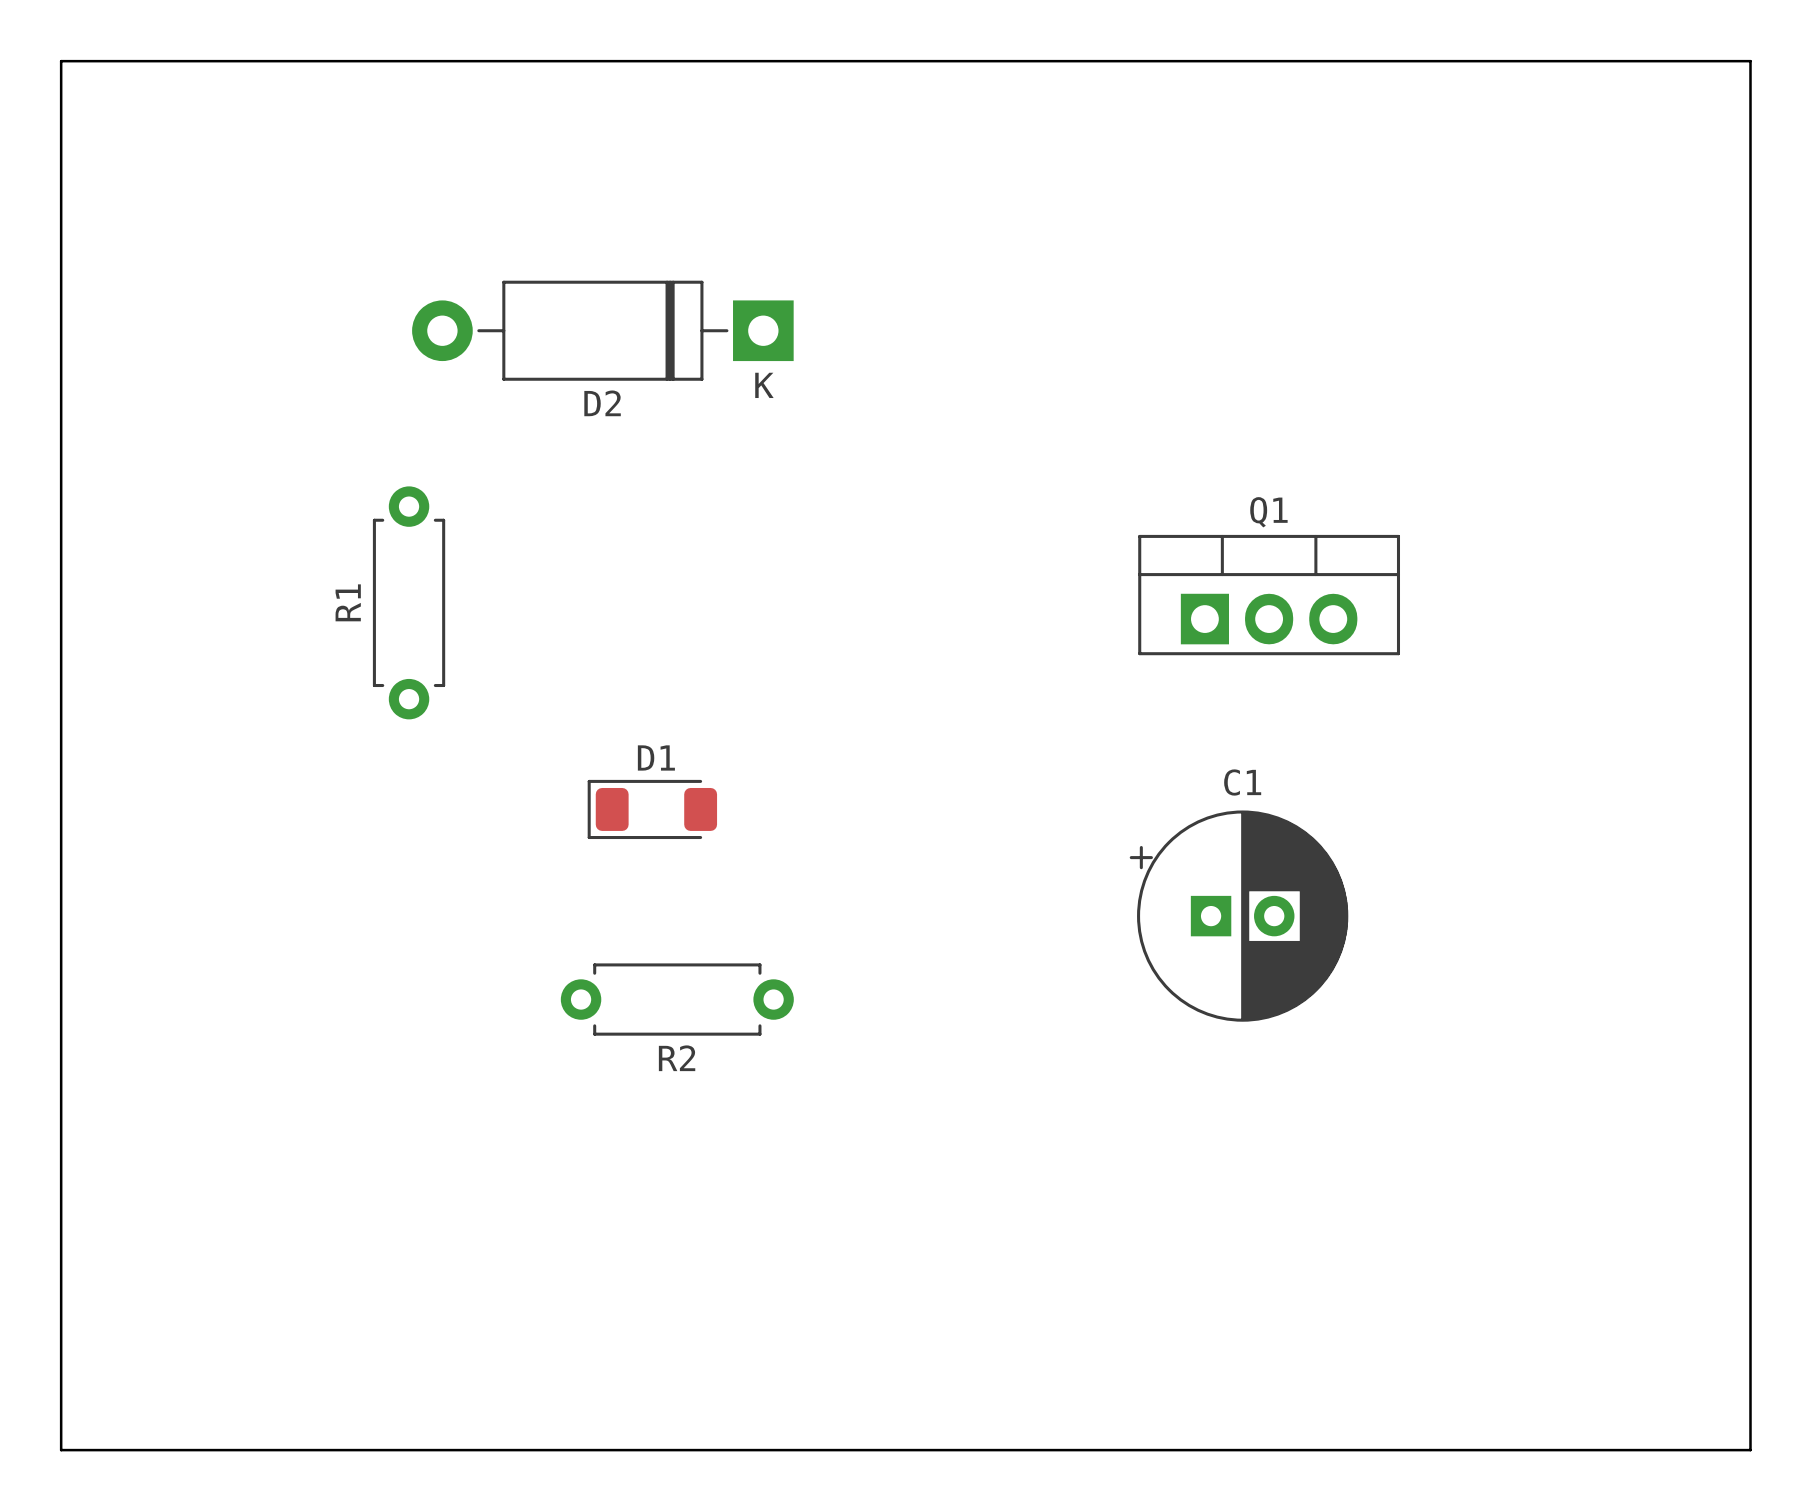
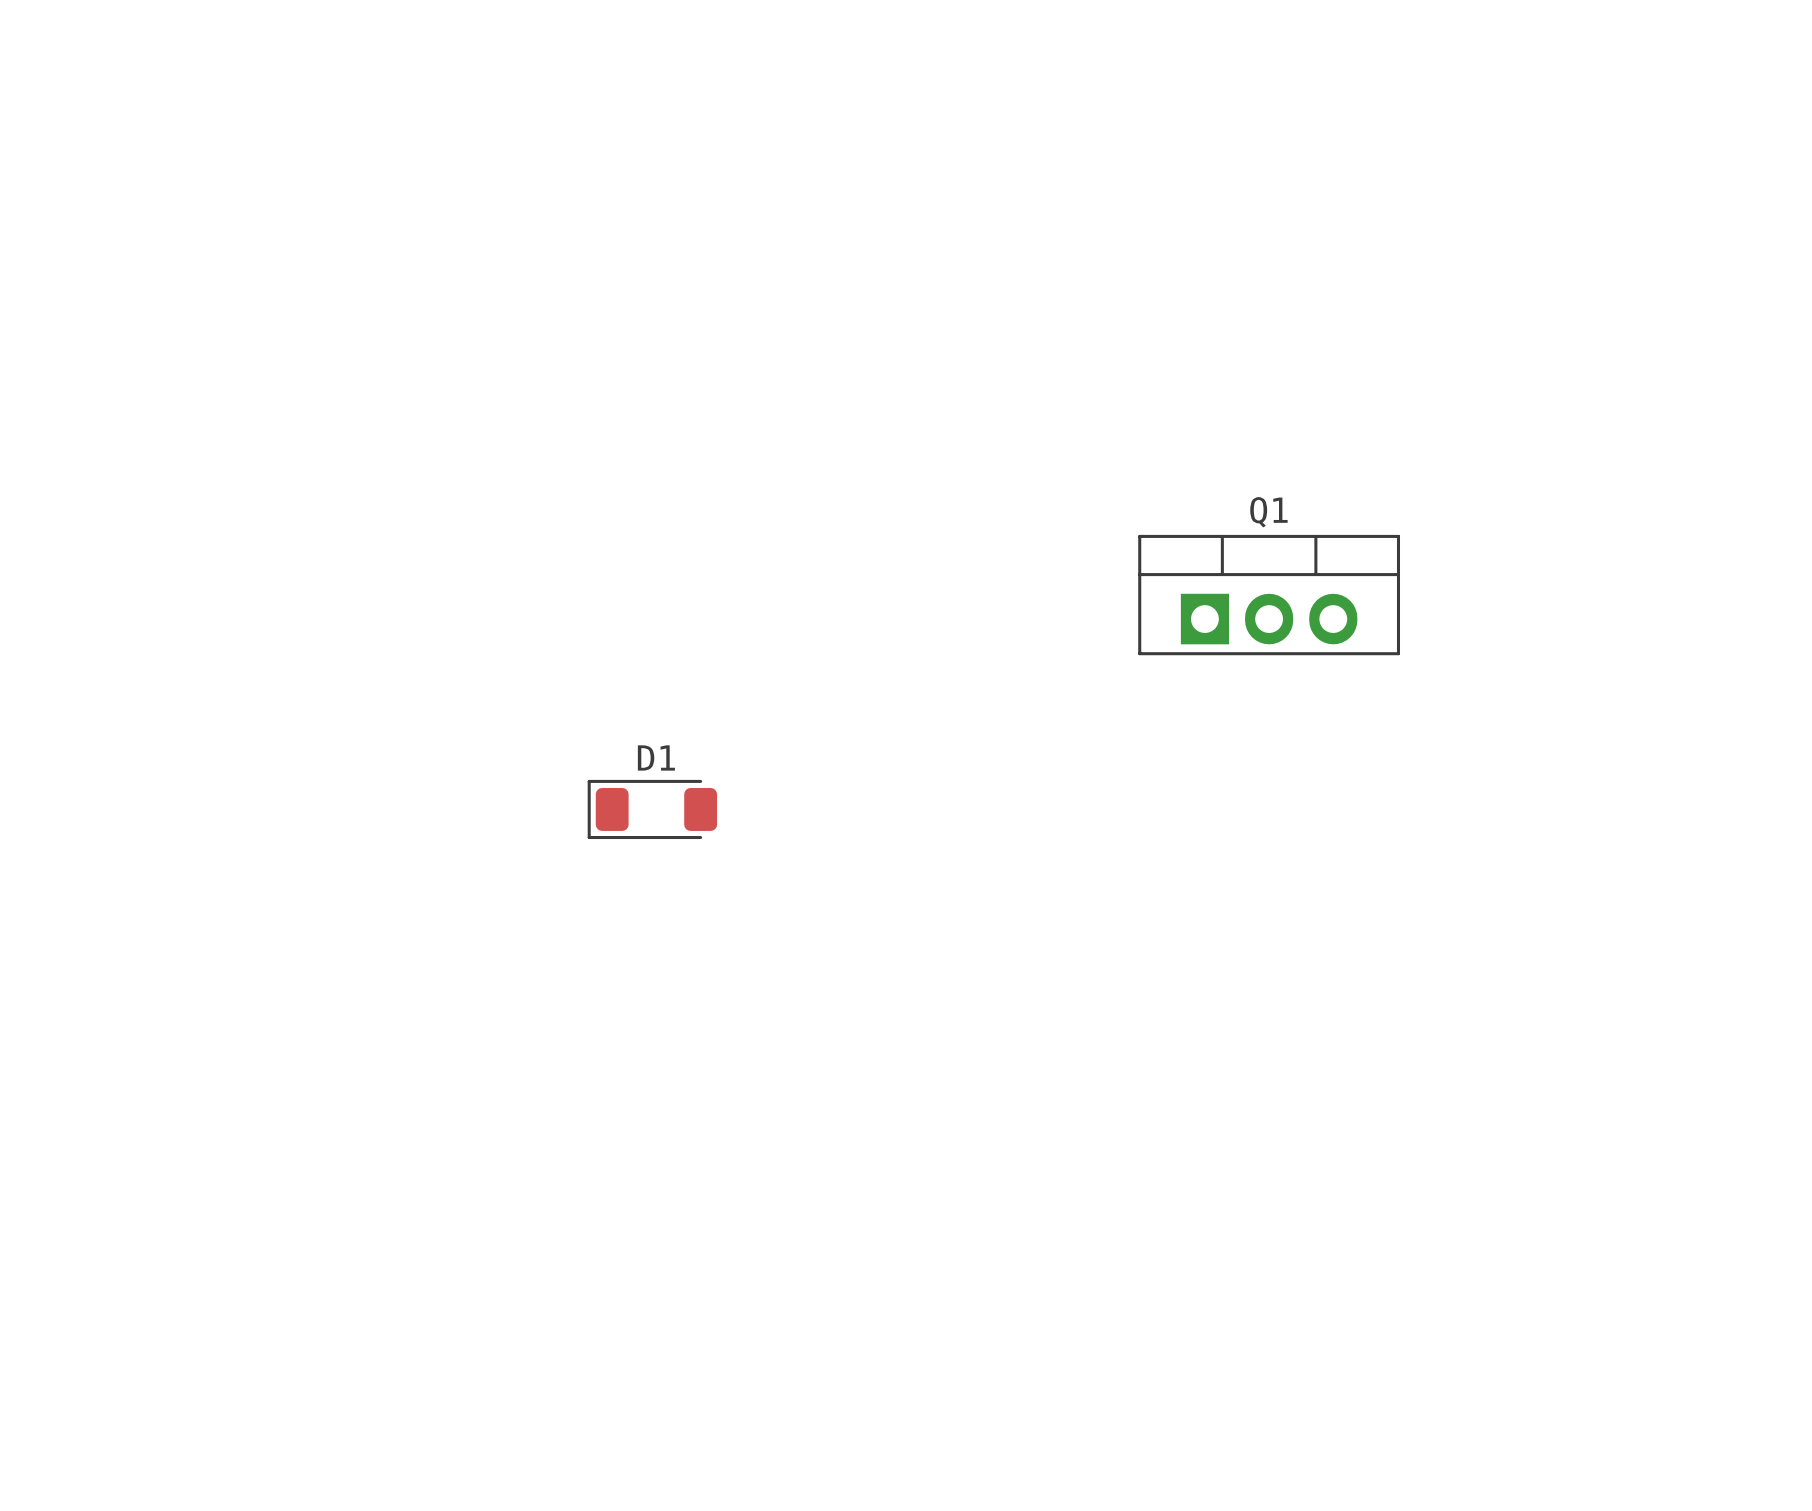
board edge: (61, 61) (1750, 61) (1750, 1450) (61, 1450) (61, 61) -> none
D2: (602, 330) -> none
R1: (409, 602) -> none
C1: (1238, 916) -> none
R2: (677, 999) -> none

